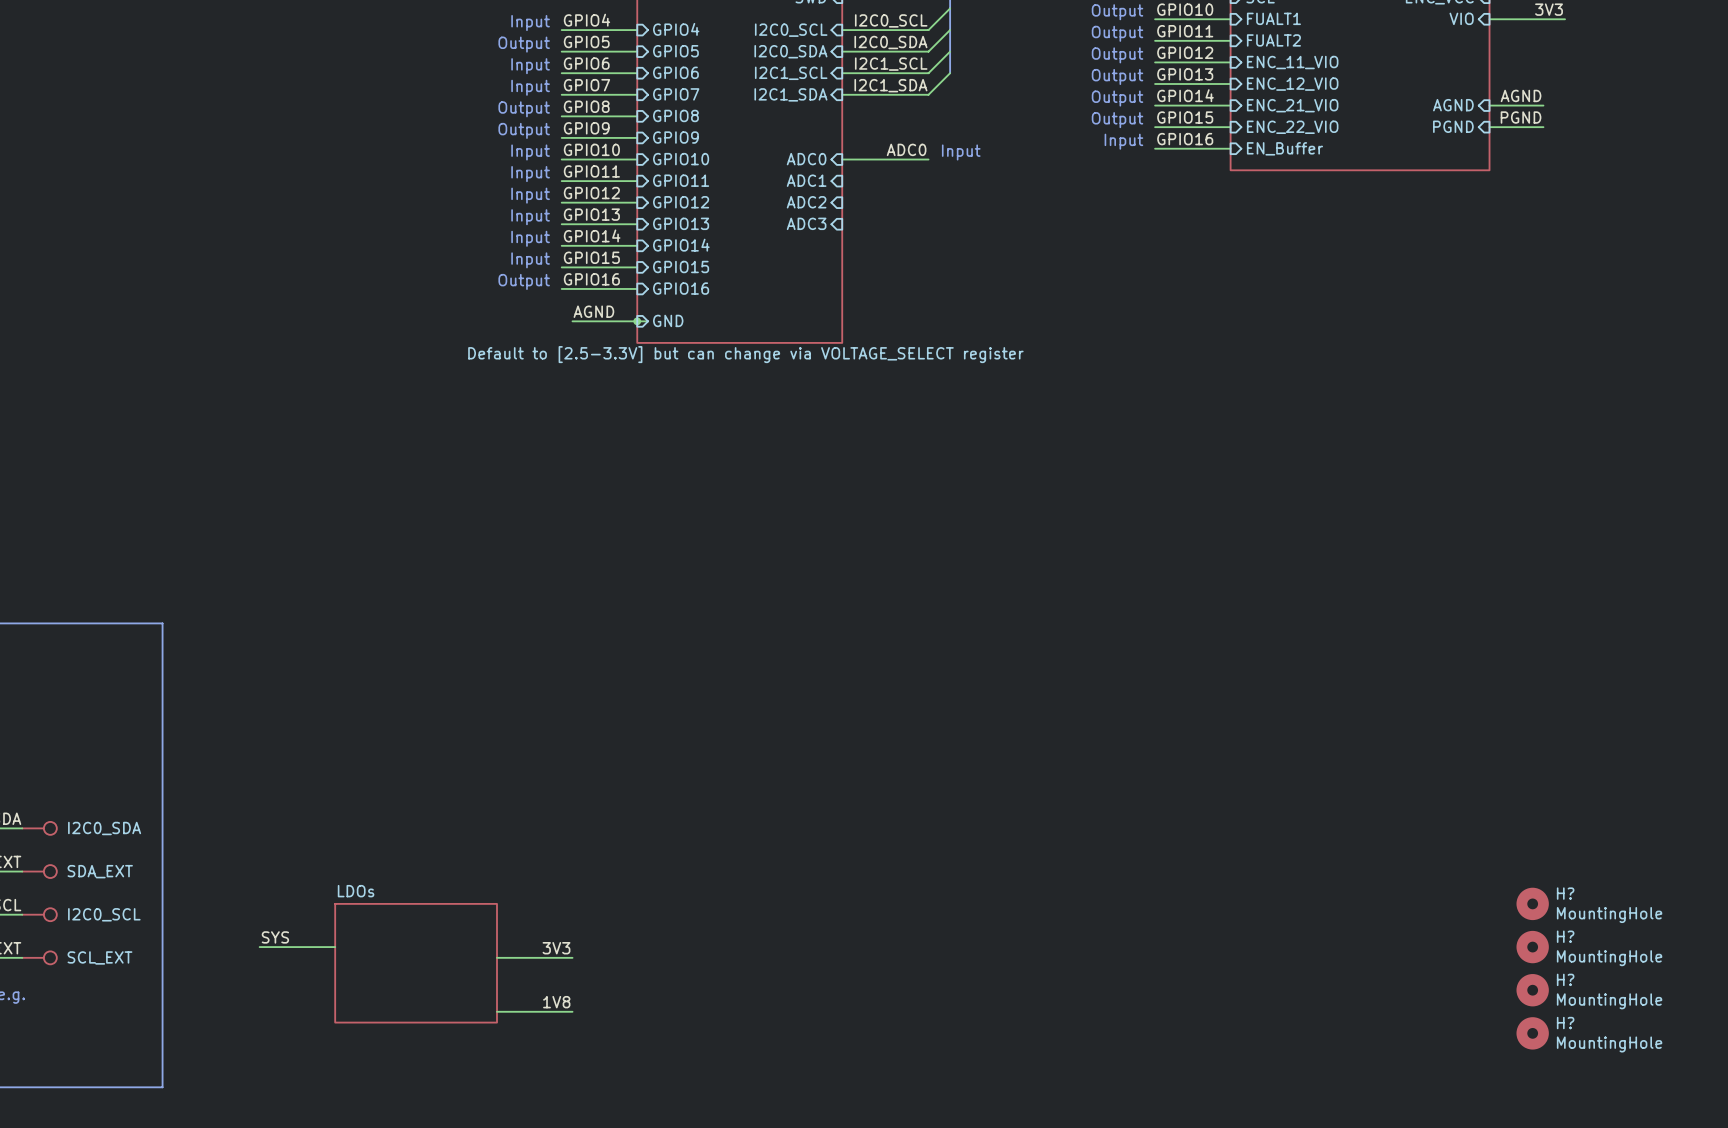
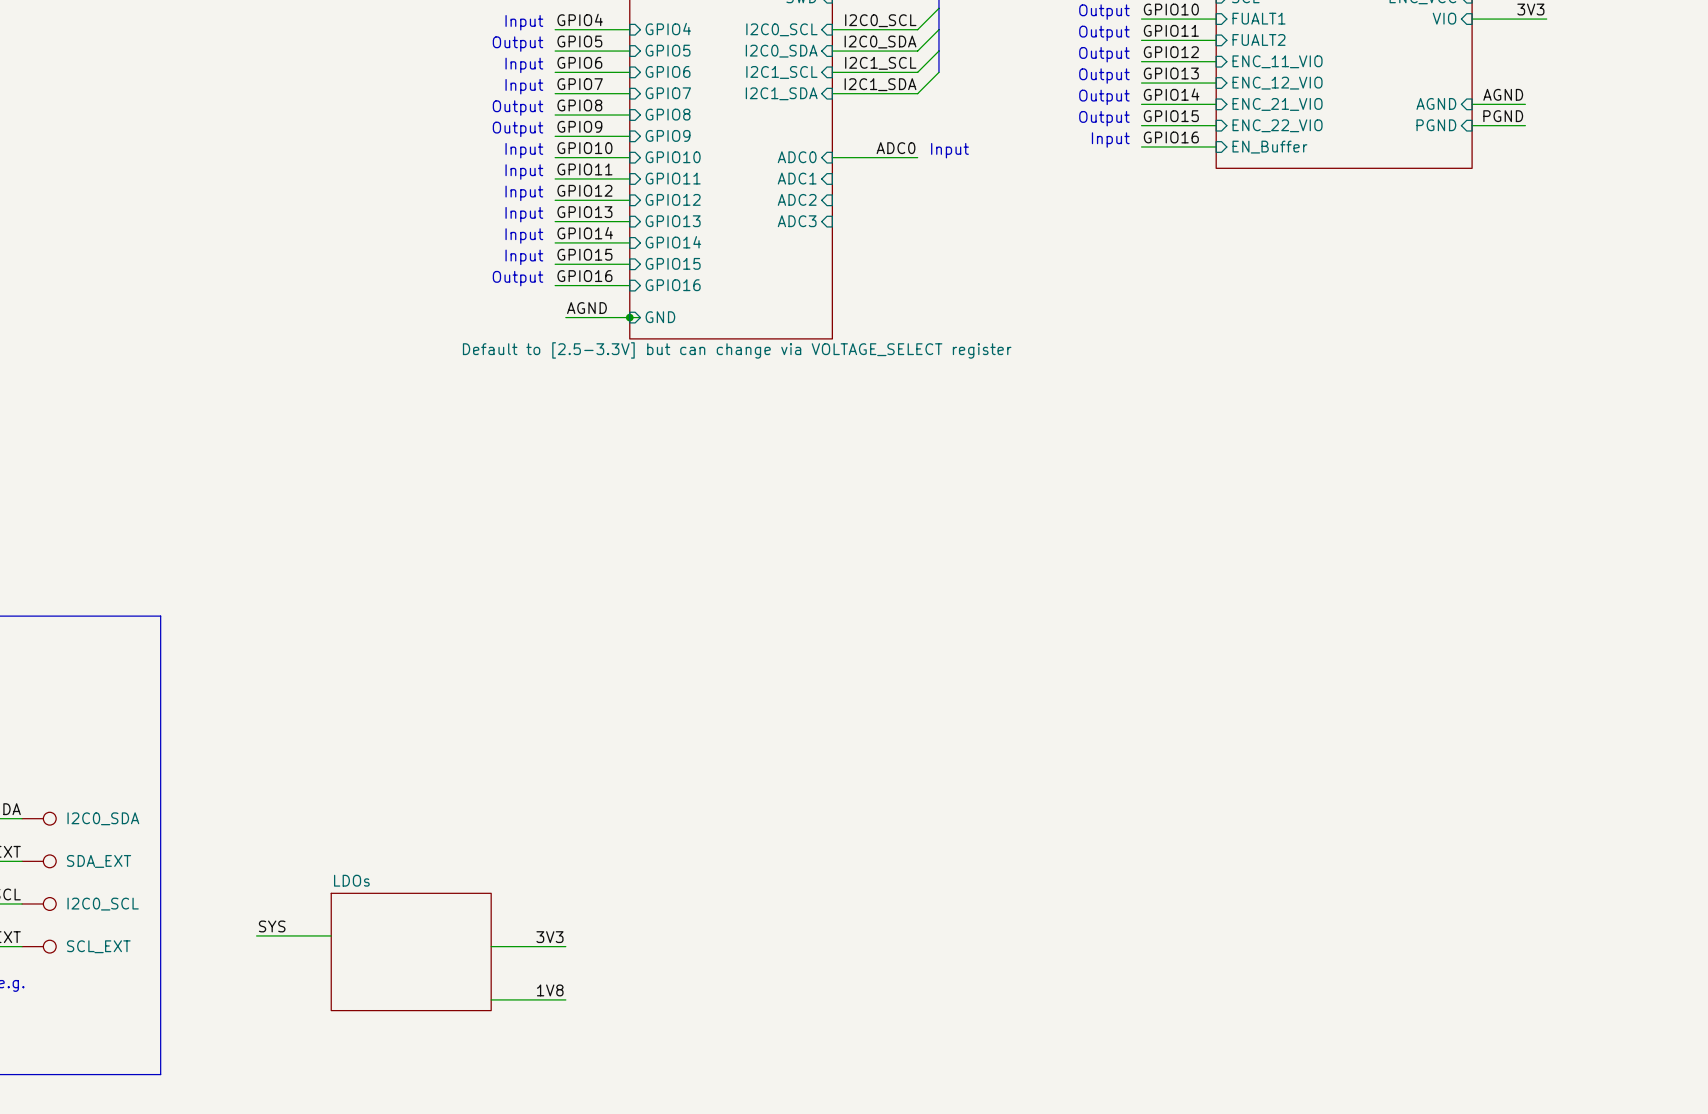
H?: MountingHole (1532, 903) -> none
H?: MountingHole (1532, 947) -> none
H?: MountingHole (1532, 990) -> none
H?: MountingHole (1532, 1033) -> none

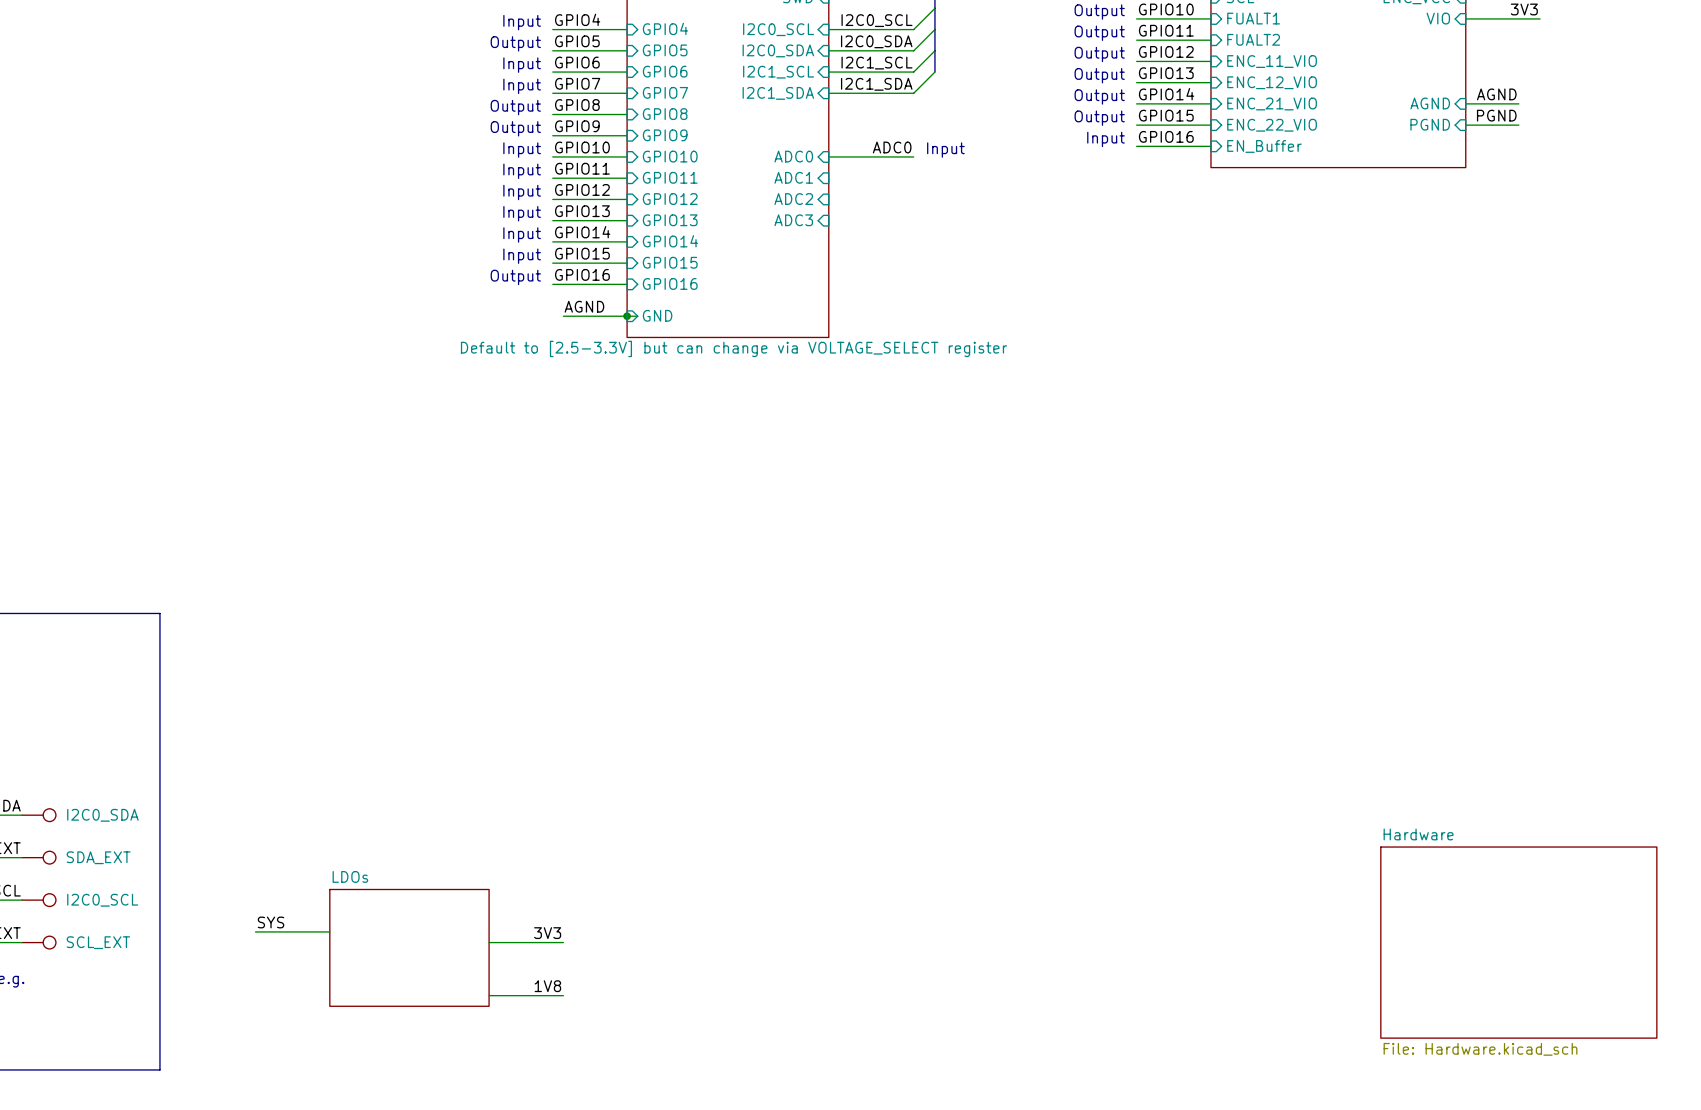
sheet Hardware: none -> File: Hardware.kicad_sch (1518, 942)

